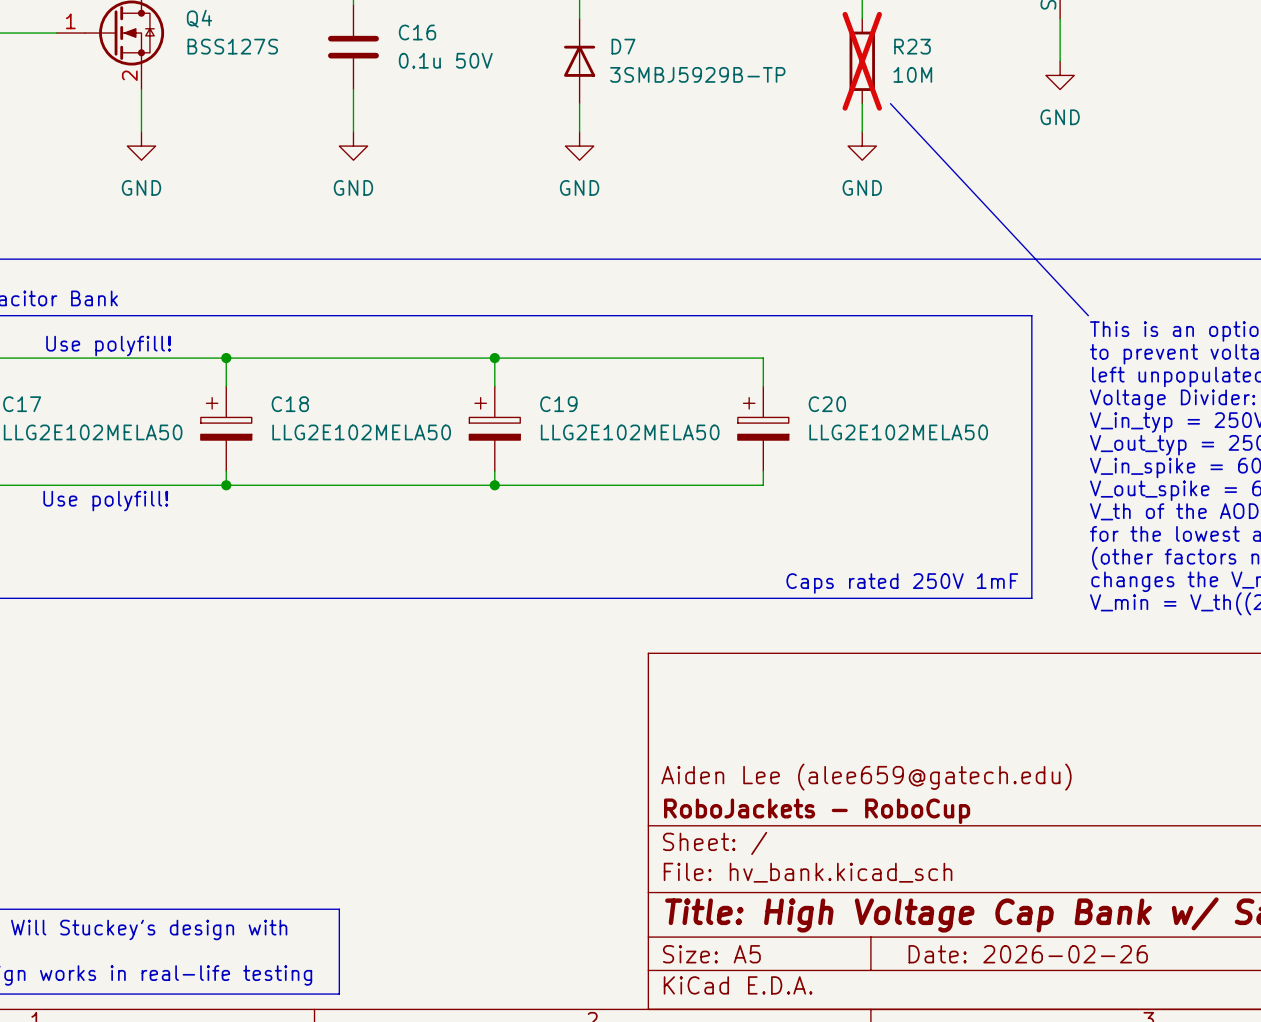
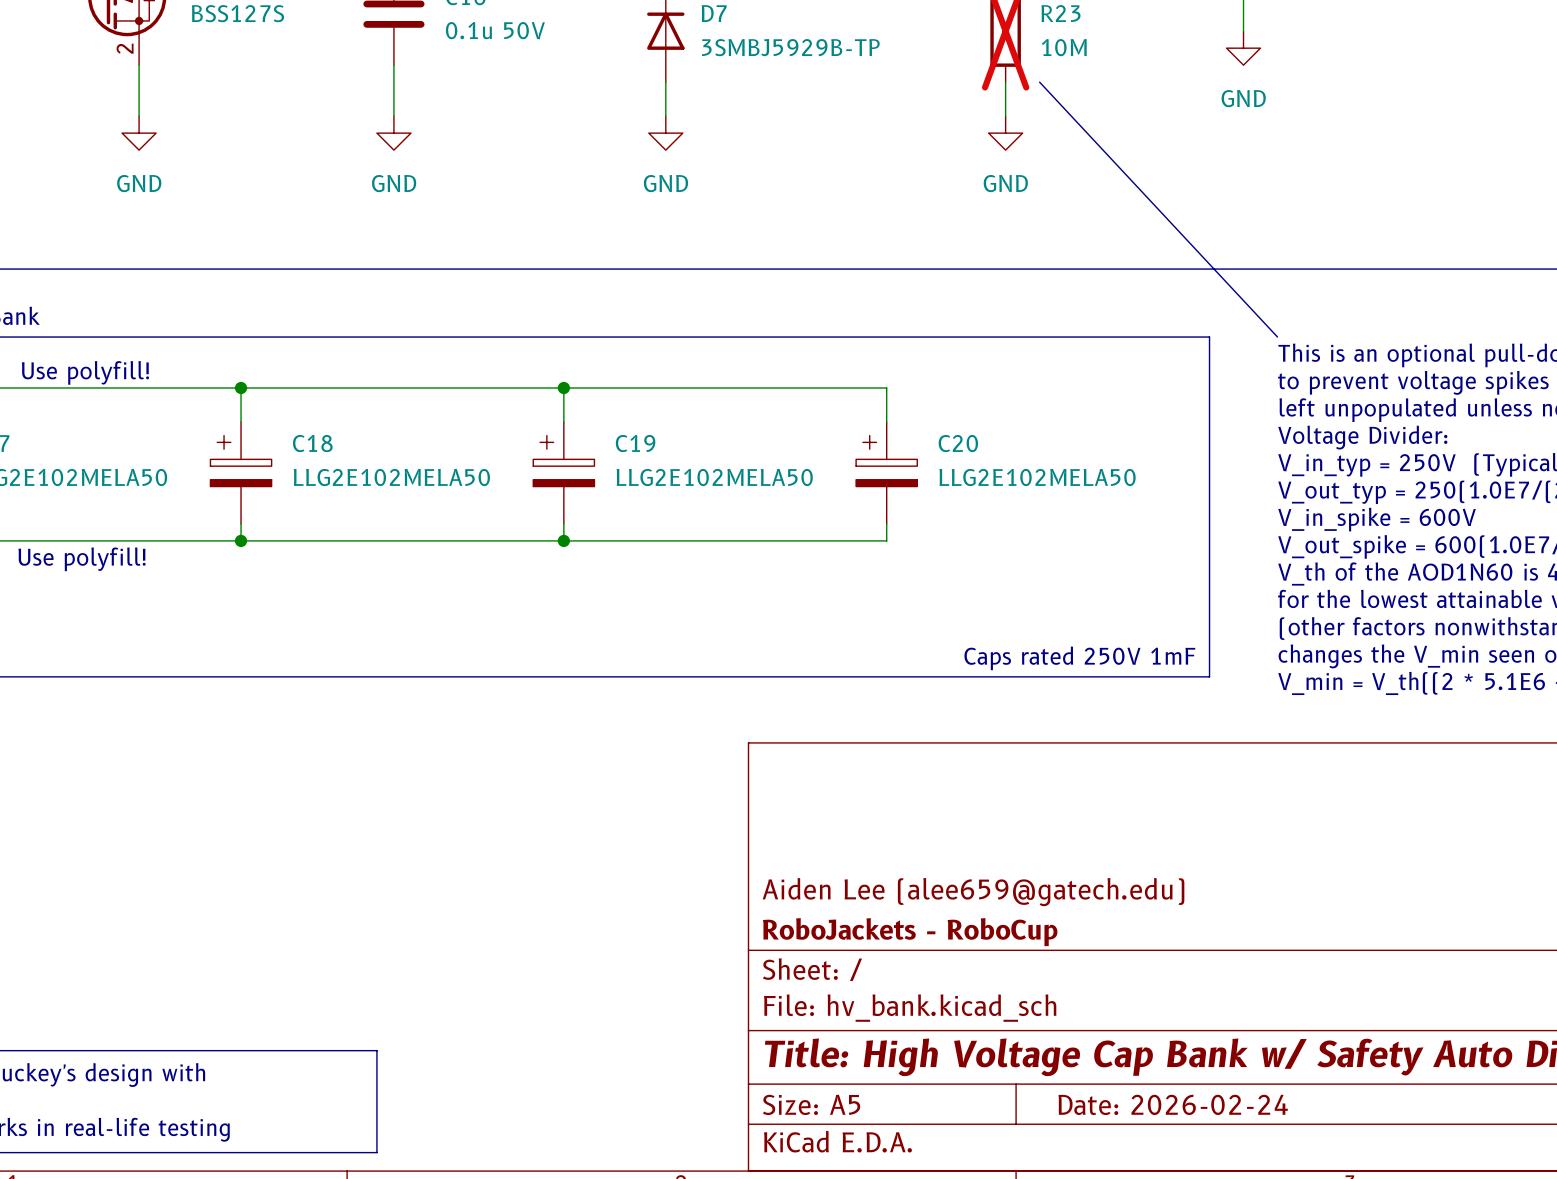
title block: Date: 2026-02-26 (1028, 954) -> Date: 2026-02-24 (1173, 1104)

